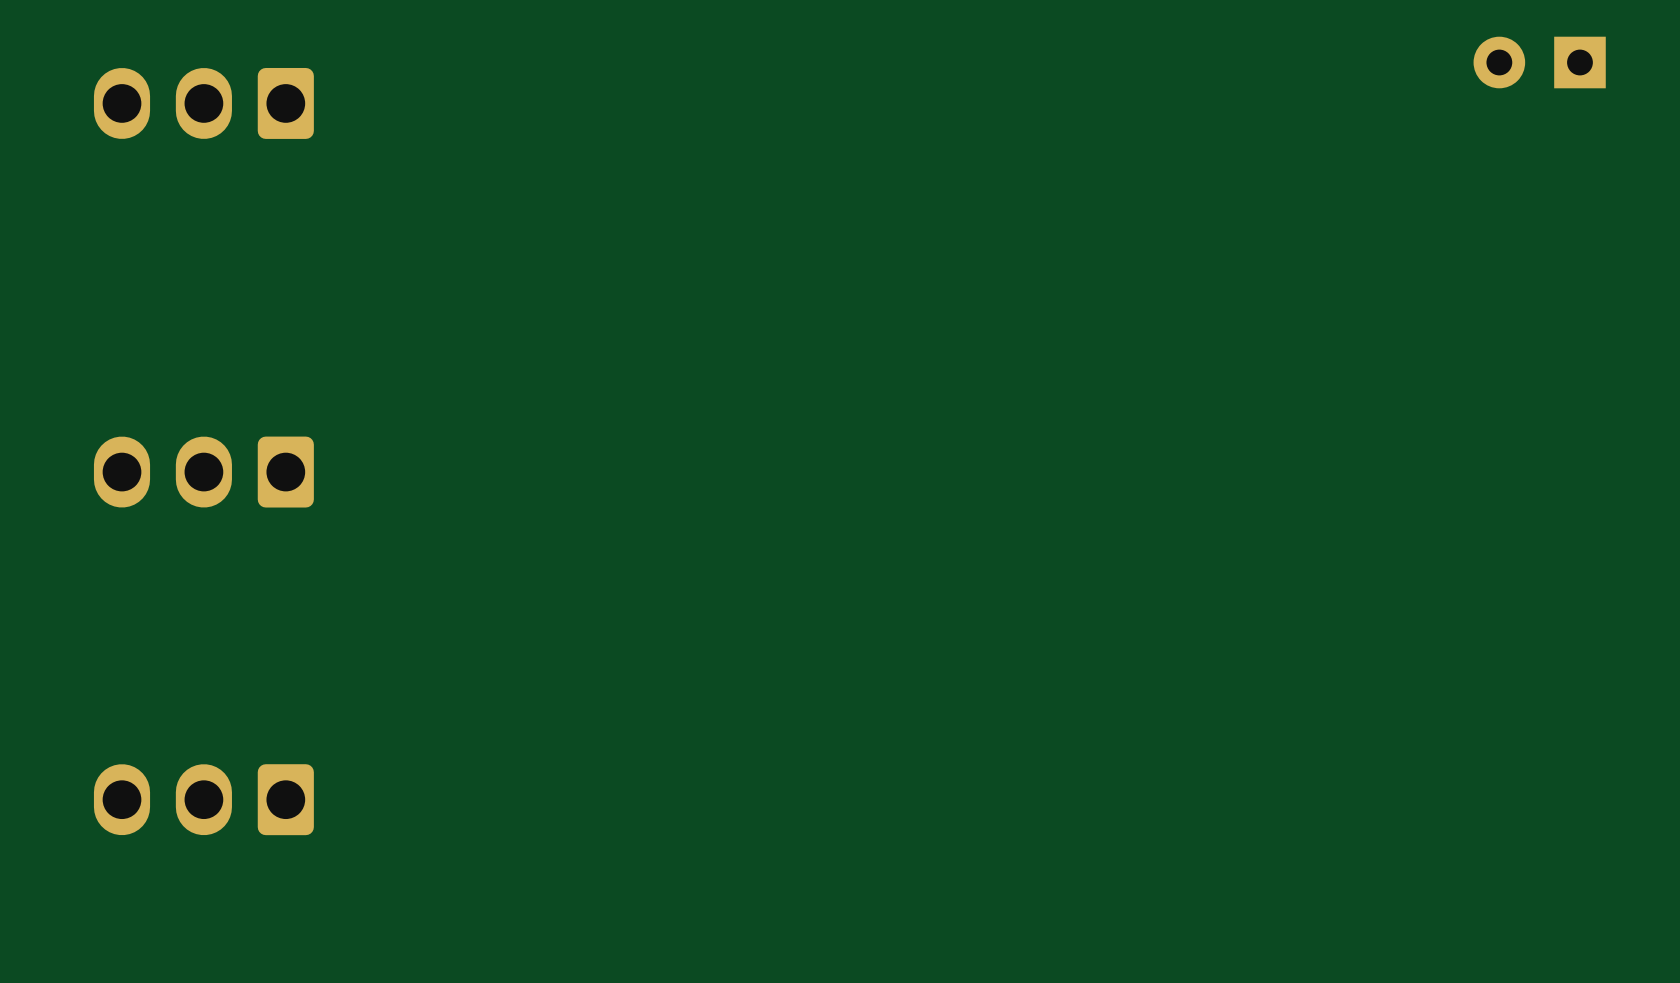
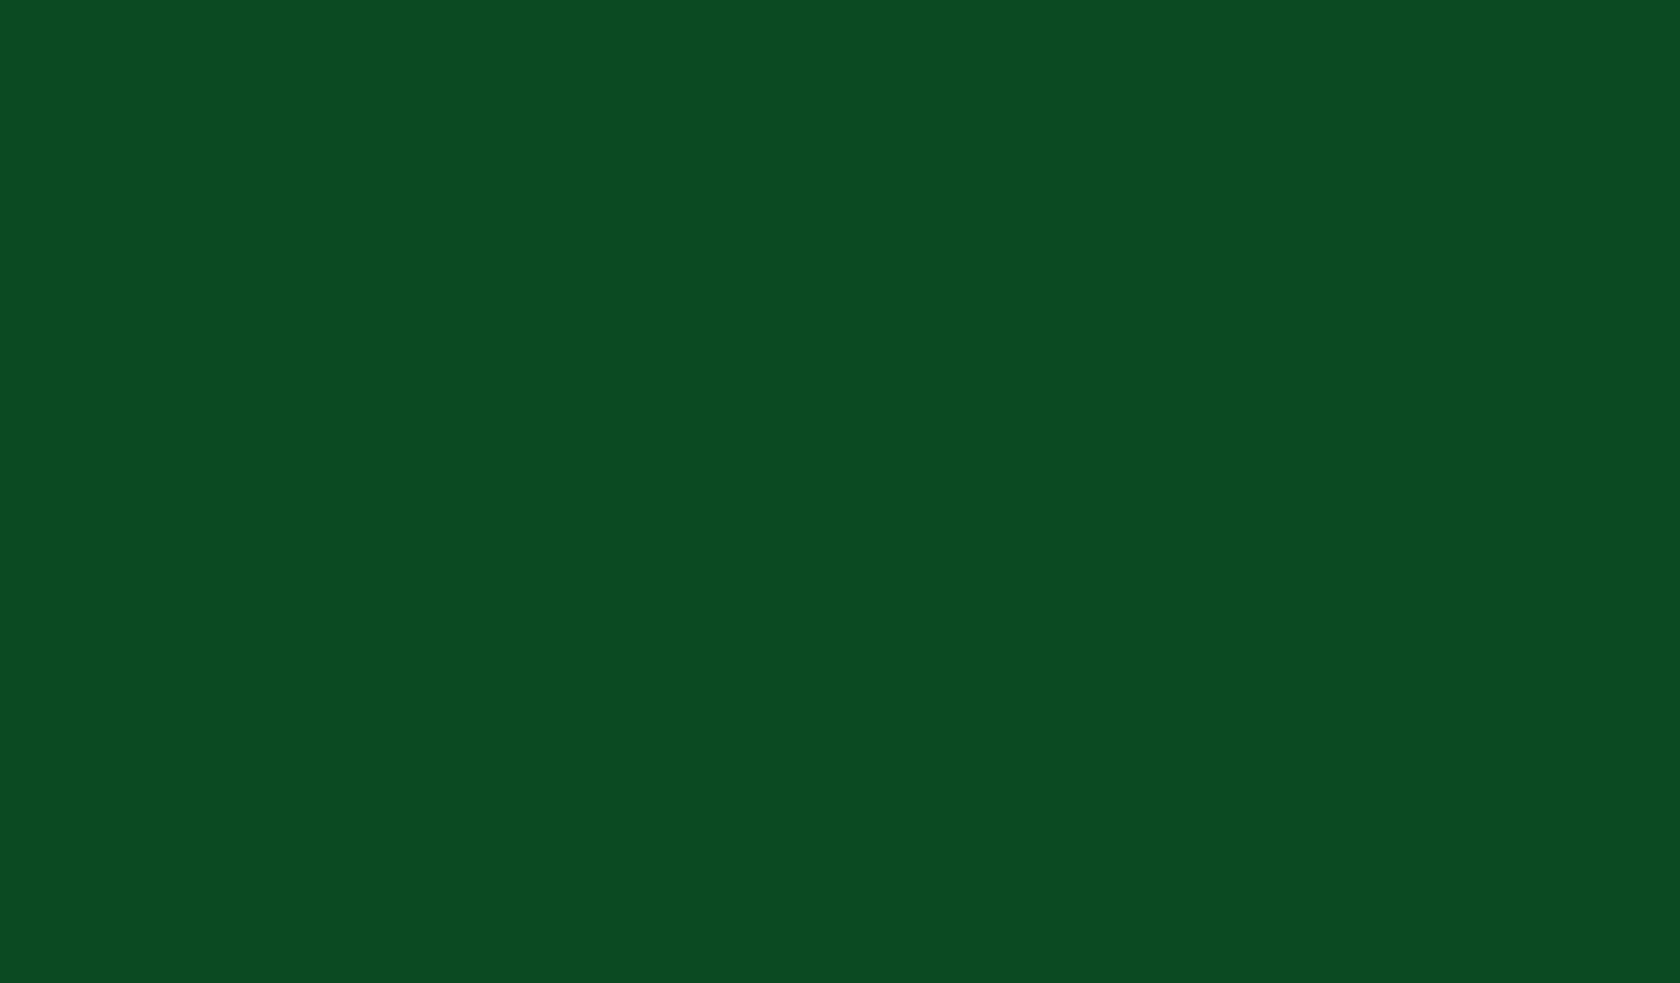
part: (1539, 62) -> none
part: (203, 103) -> none
part: (203, 472) -> none
part: (203, 799) -> none

